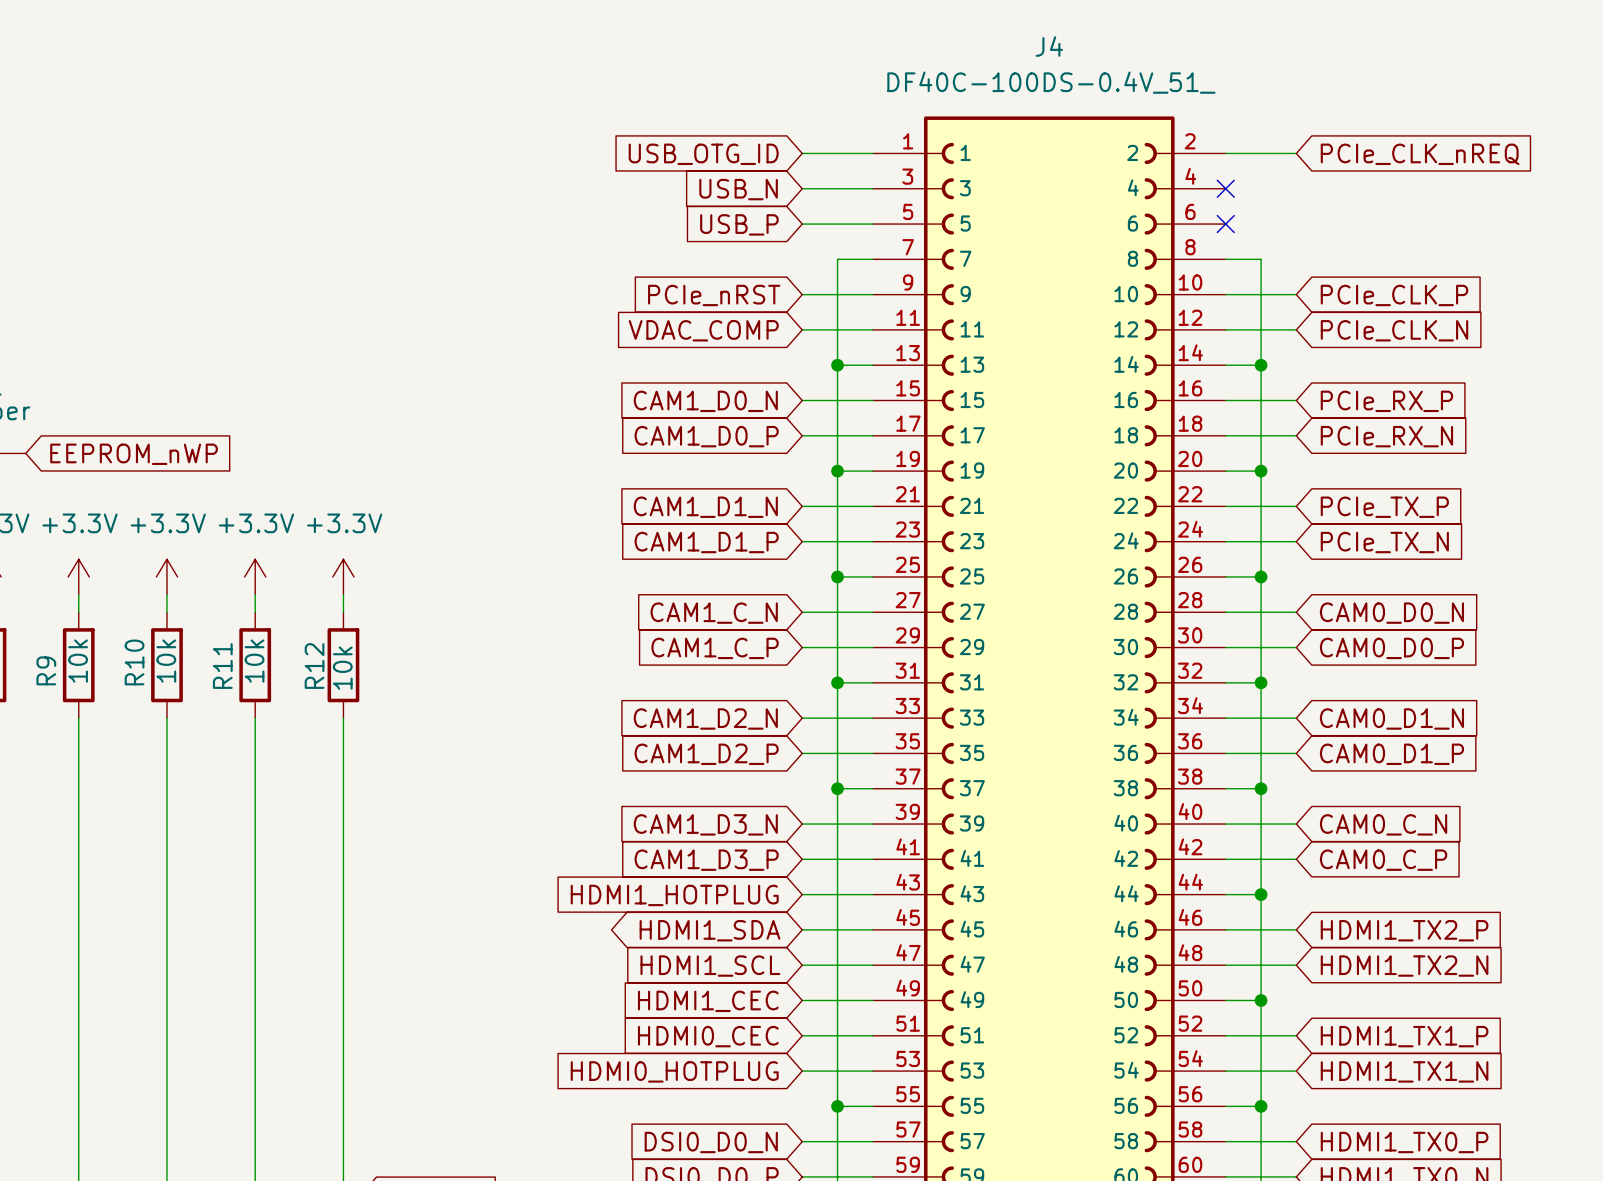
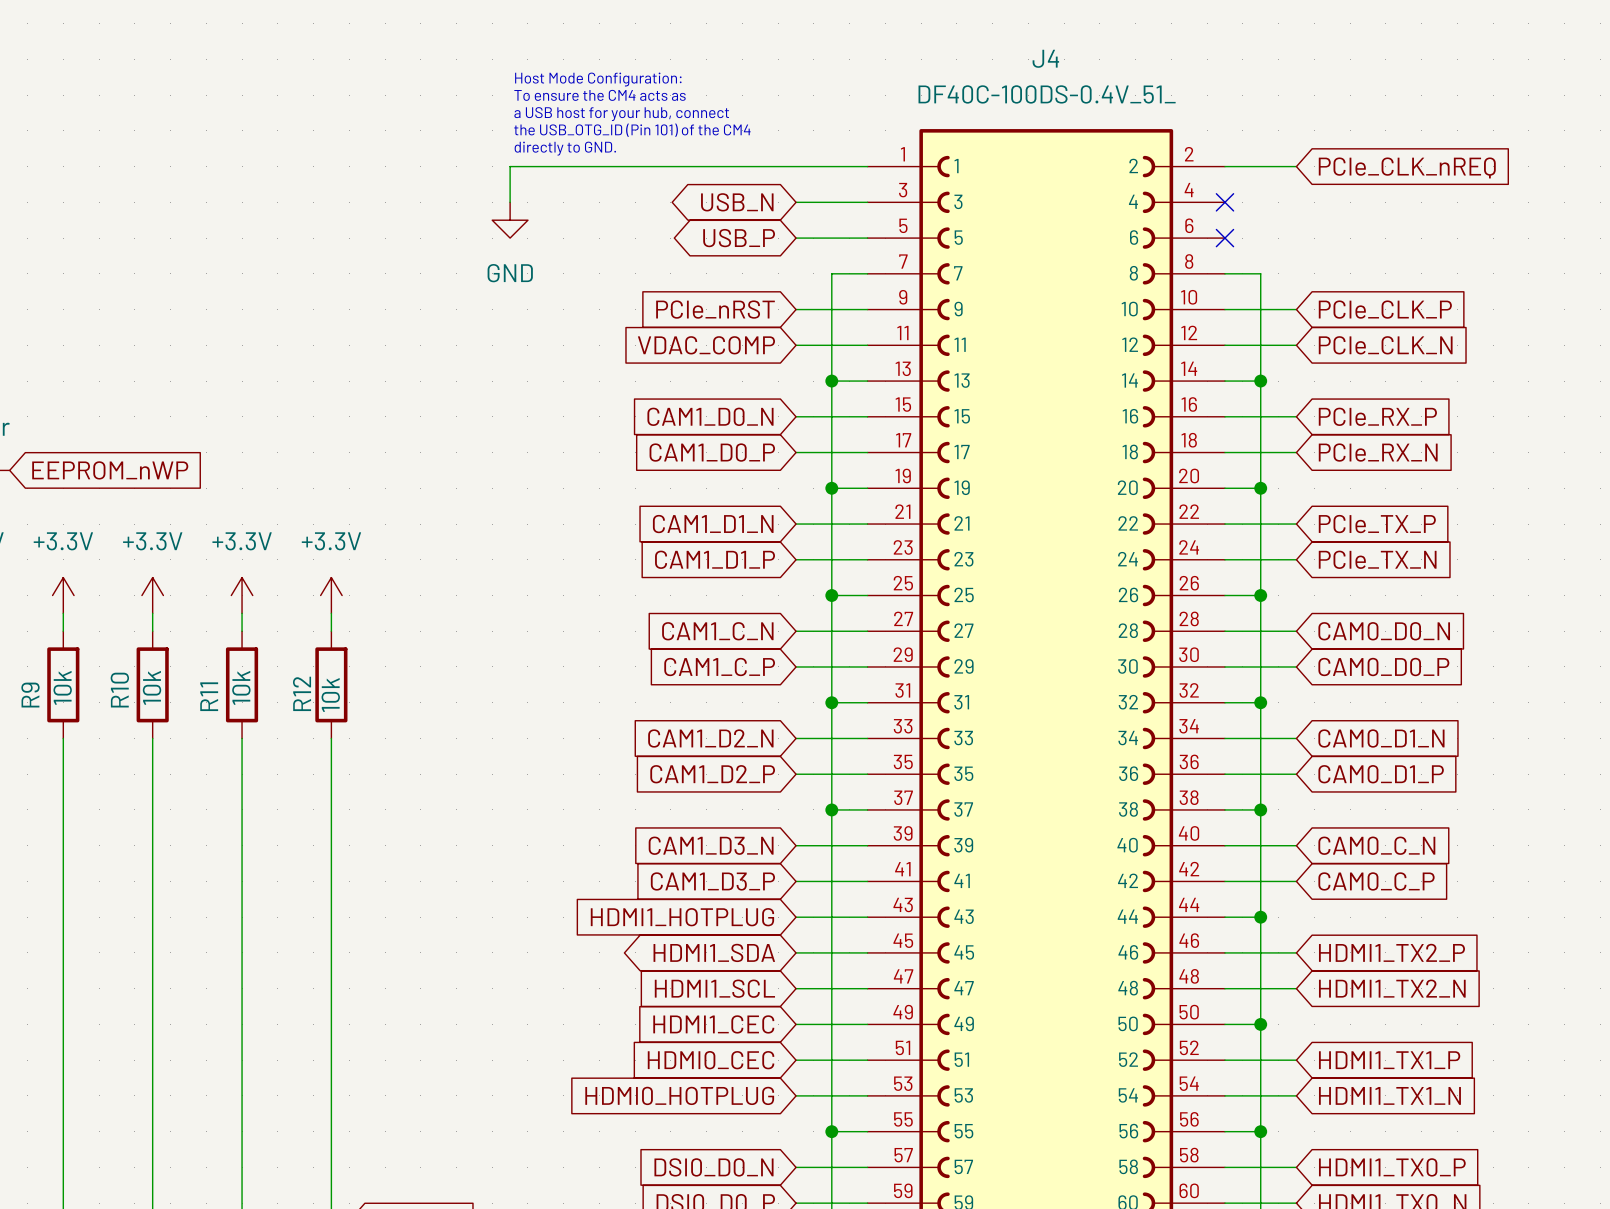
text: none -> Host Mode Configuration: (598, 79)
text: none -> To ensure the CM4 acts as (600, 95)
text: none -> a USB host for your hub, connect (621, 114)
text: none -> the USB_OTG_ID (Pin 101) of the CM4 (632, 130)
text: none -> directly to GND. (565, 148)
wire: none -> (796, 166) (510, 166) (510, 202)
global label: USB_OTG_ID (703, 154) -> none
global label shape: input (738, 189) -> bidirectional (737, 202)
power symbol: none -> GND (510, 220)
global label shape: input (739, 224) -> bidirectional (739, 238)

